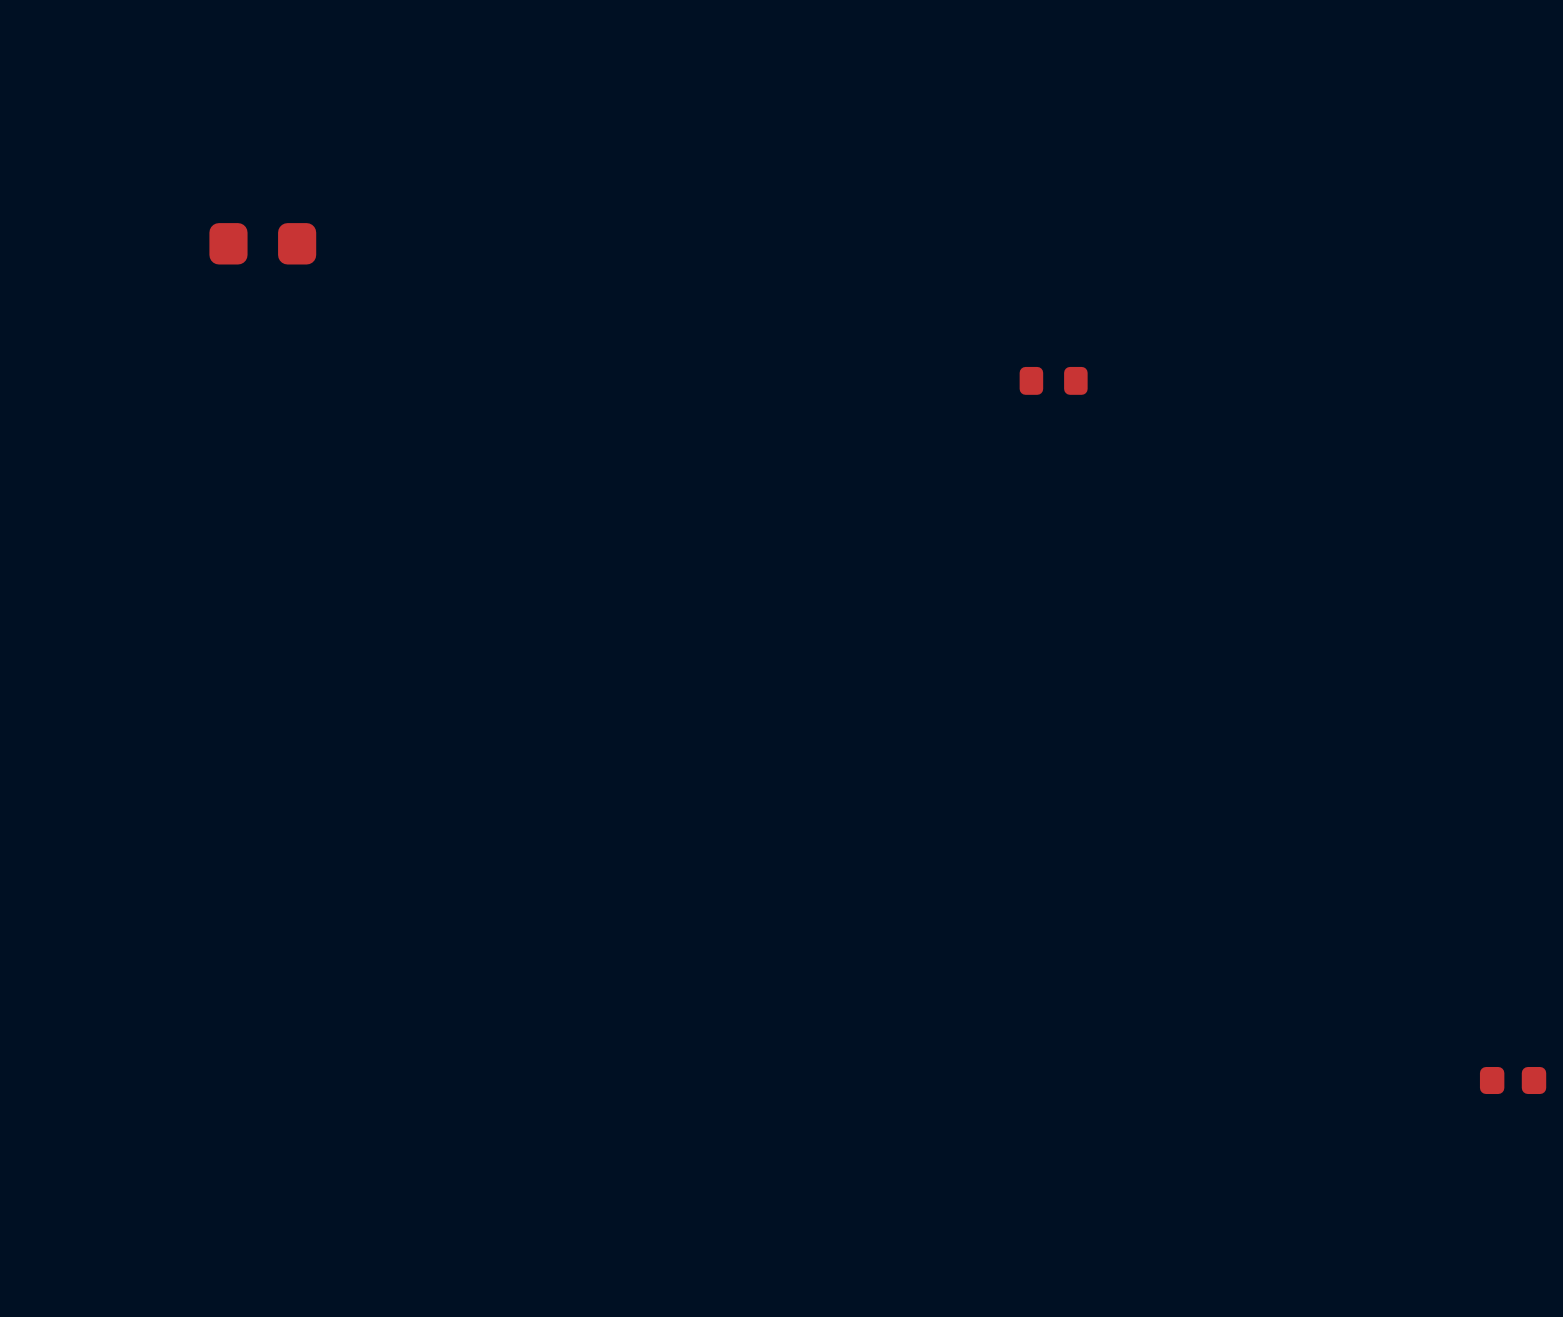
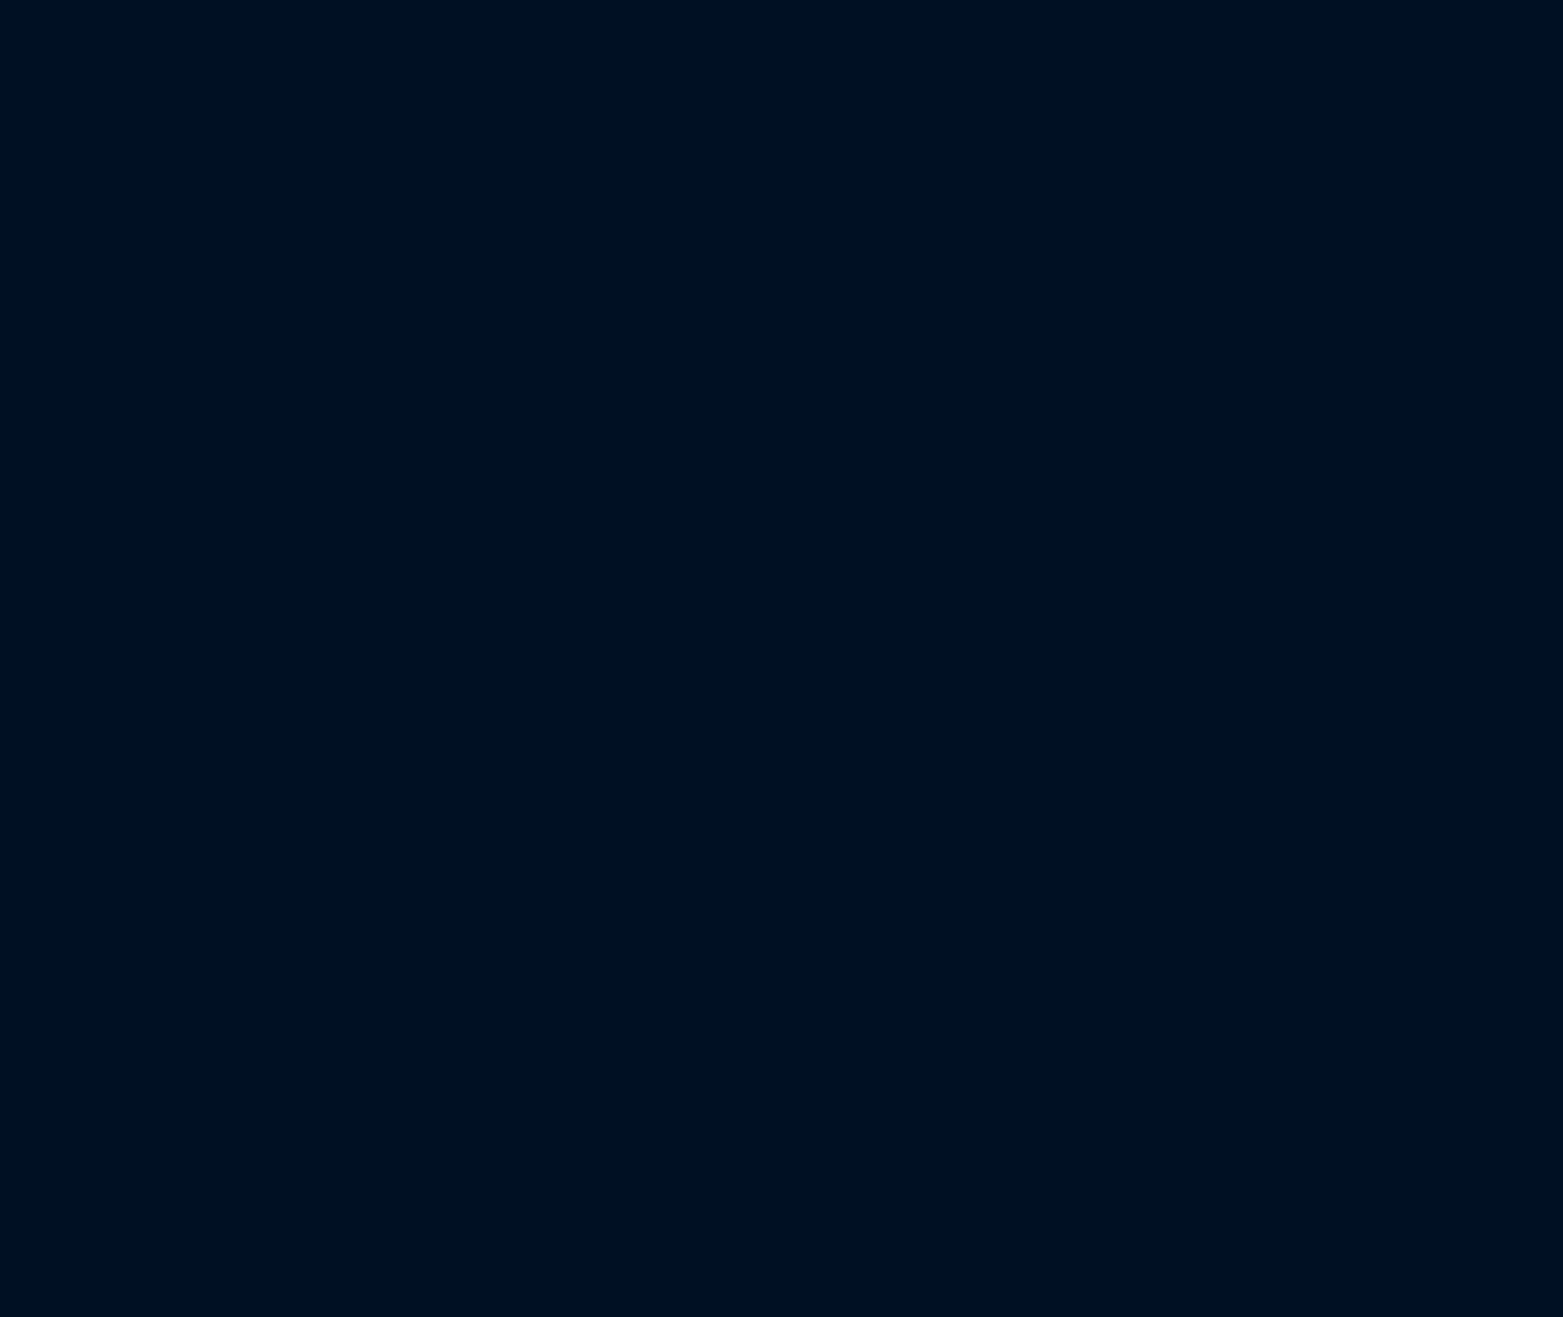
part: (262, 243) -> none
part: (1053, 380) -> none
part: (1513, 1080) -> none

